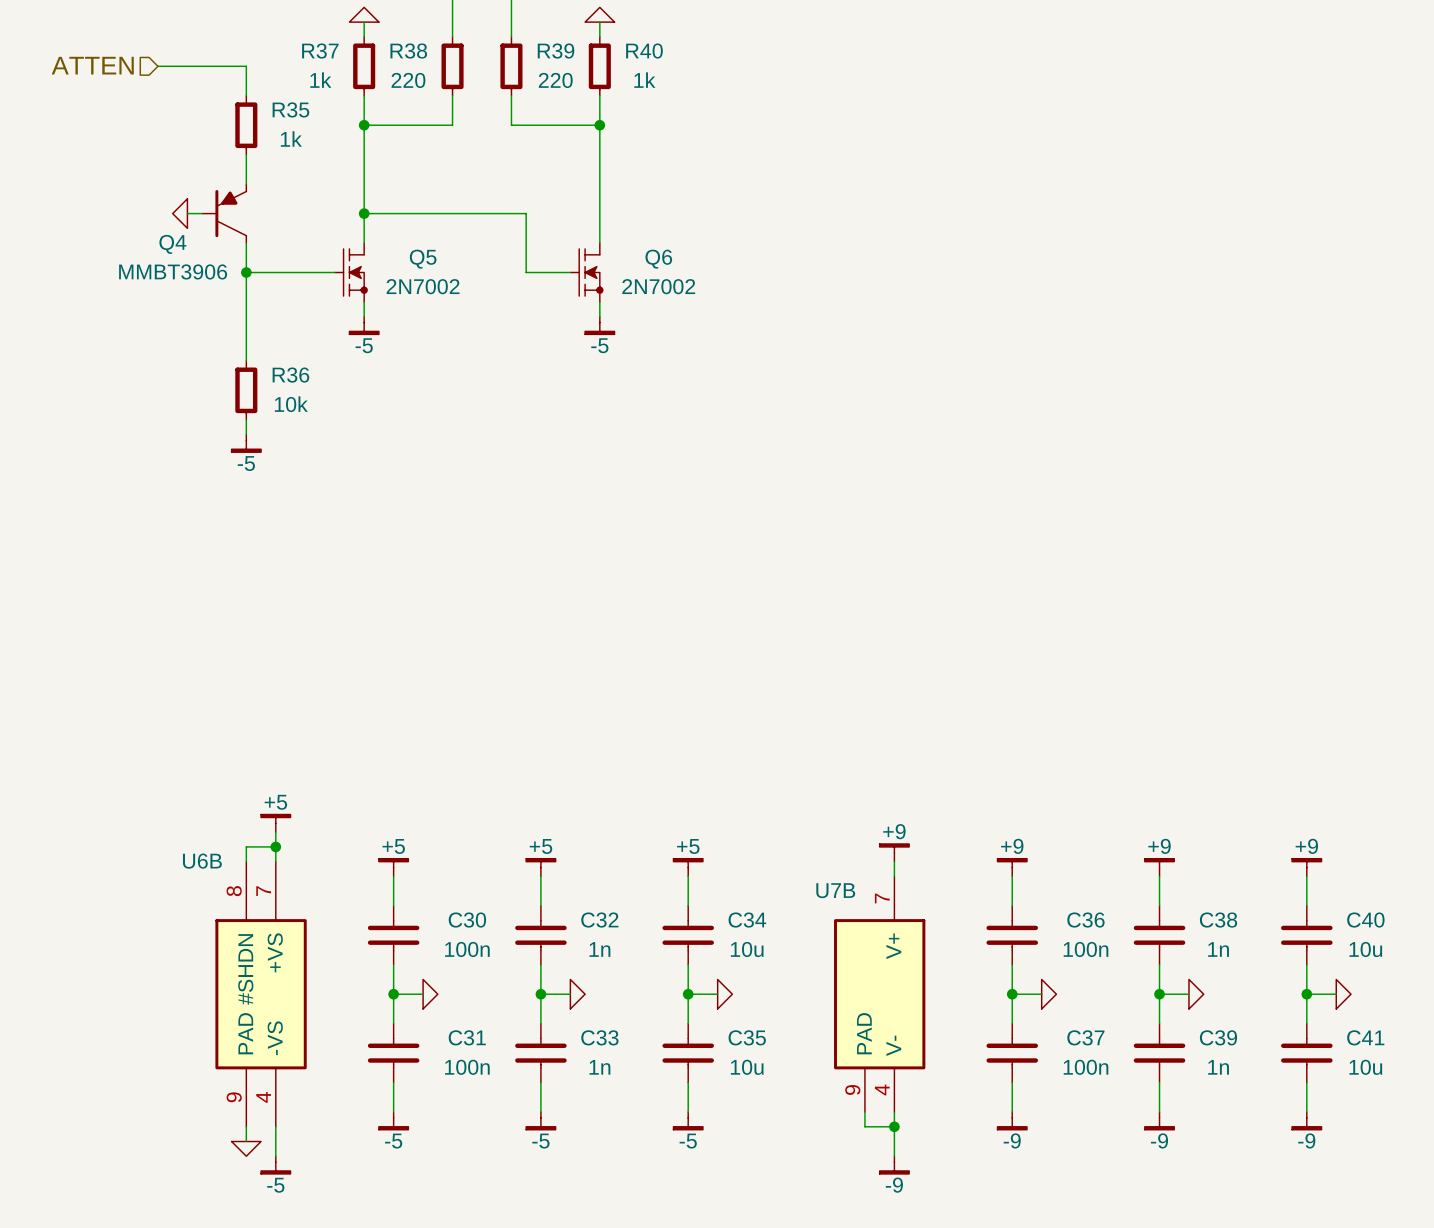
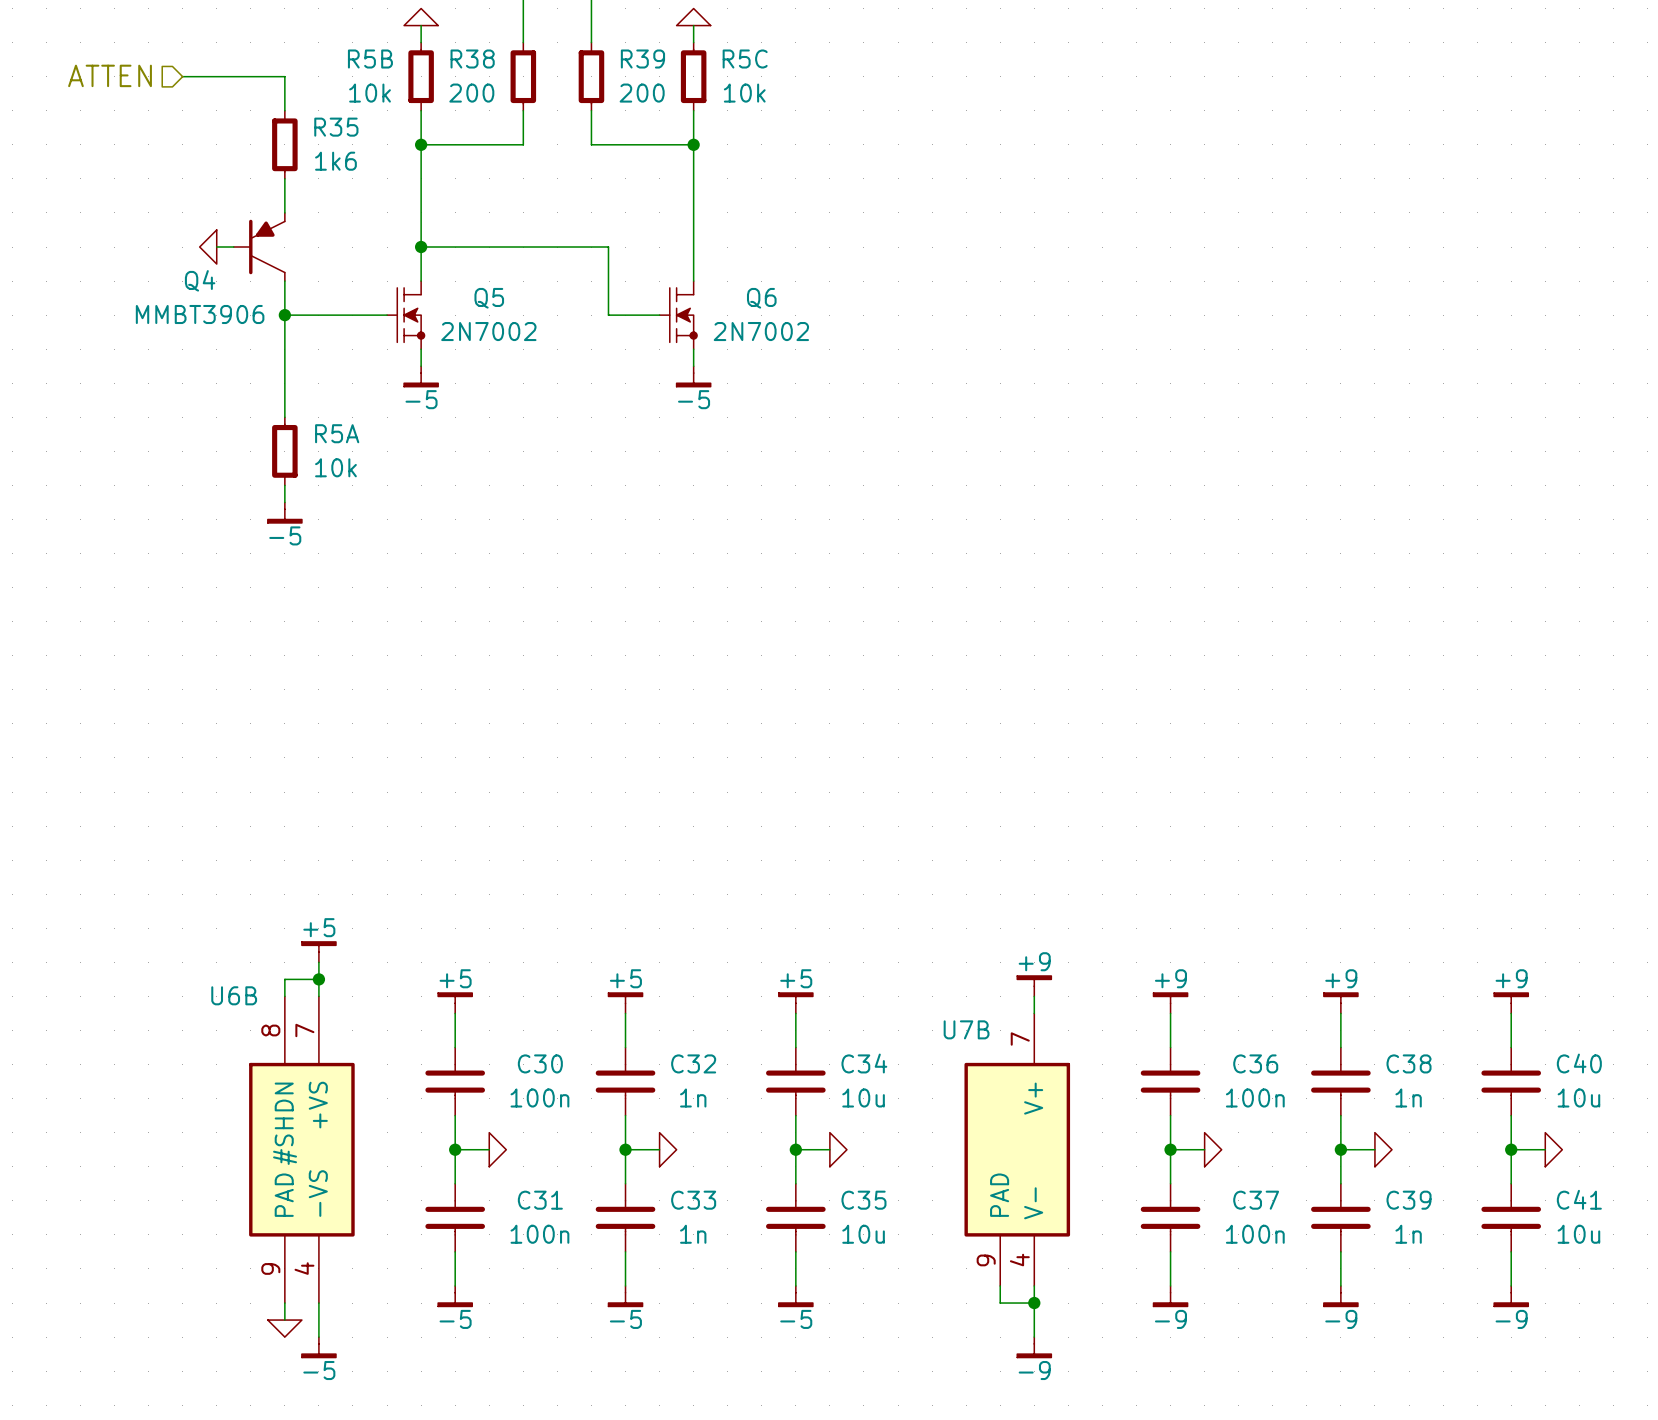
R37: 1k (364, 66) -> none
R5B: none -> 10k (421, 76)
R40: 1k (599, 66) -> none
R5C: none -> 10k (693, 76)
R38 value: 220 (408, 80) -> 200 (471, 93)
R39 value: 220 (555, 80) -> 200 (642, 93)
R35 value: 1k (291, 139) -> 1k6 (335, 161)
R36: 10k (246, 390) -> none
R5A: none -> 10k (284, 451)

